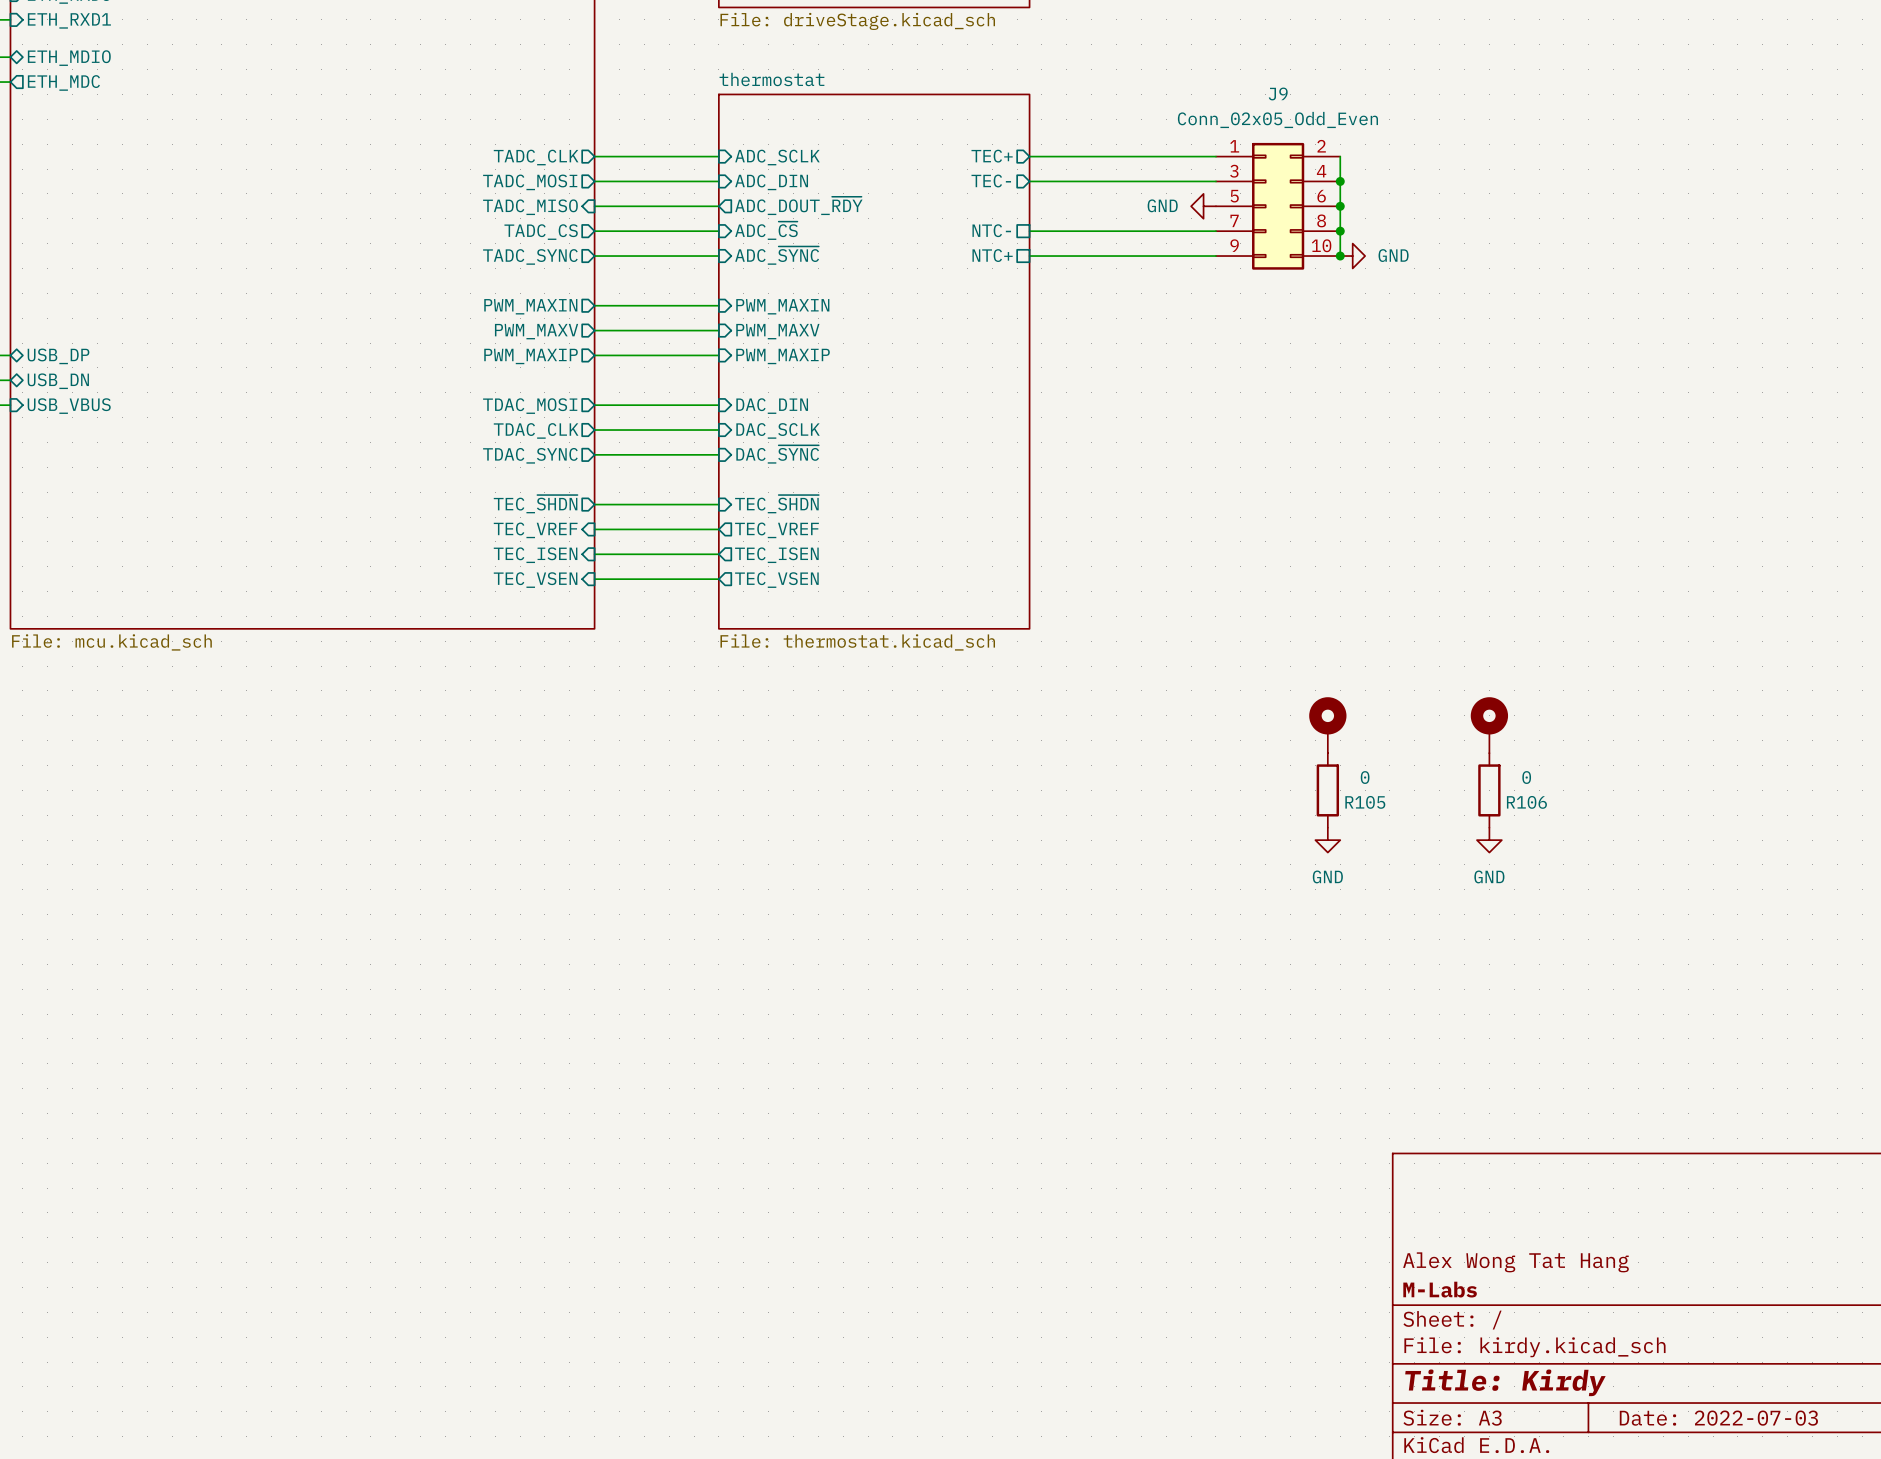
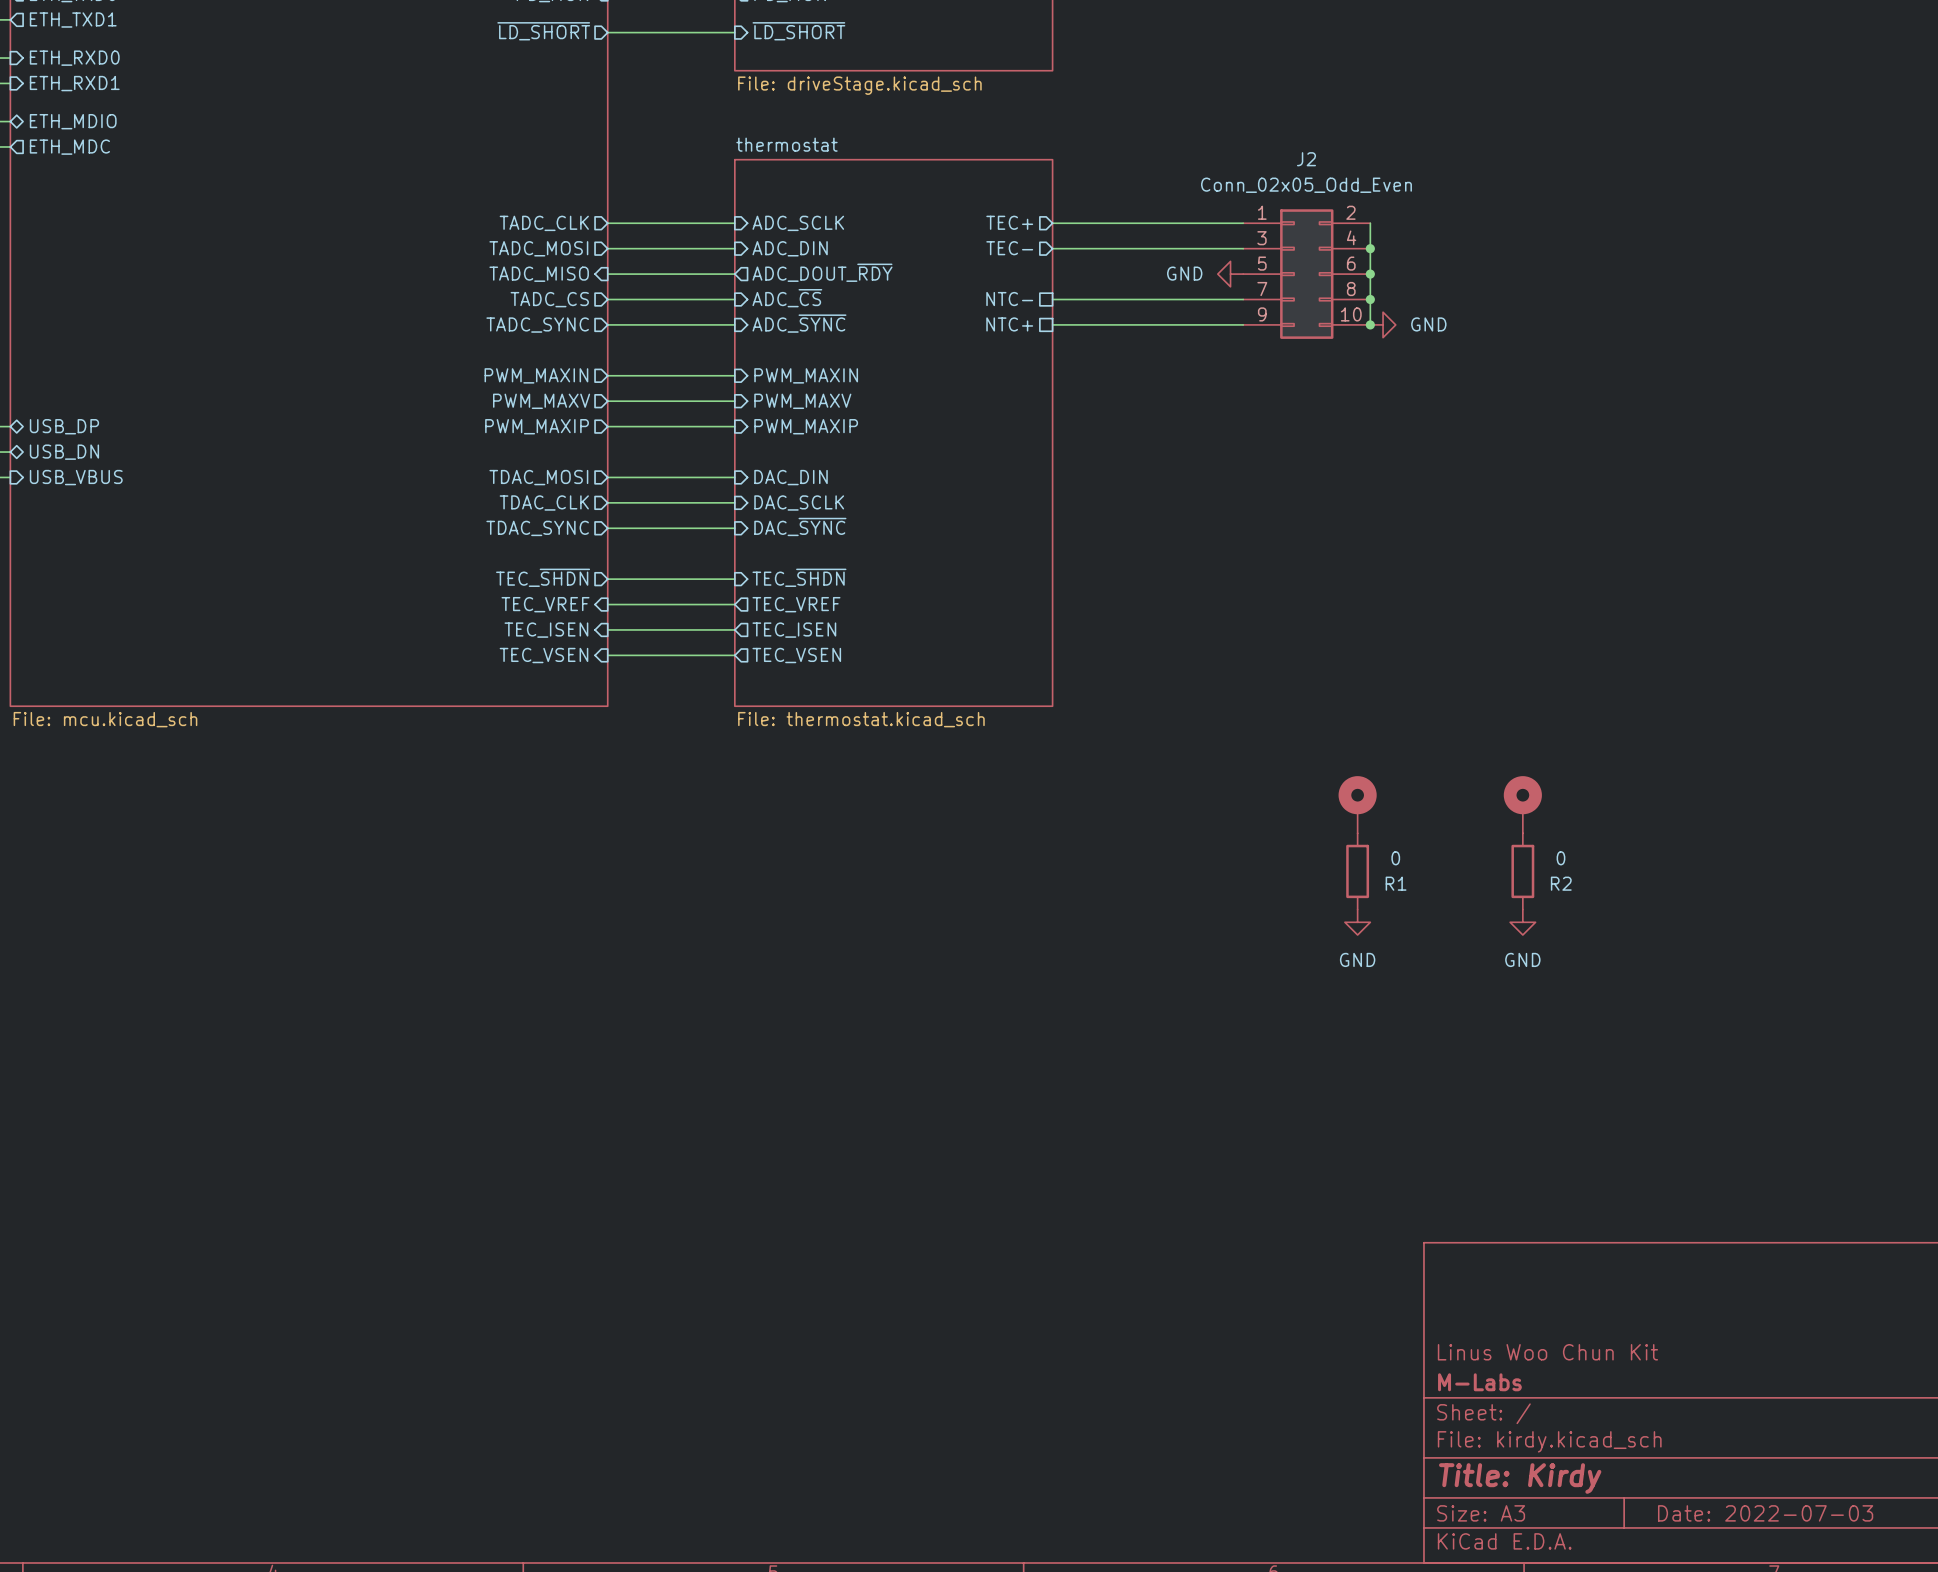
J9 name: J9 (1278, 93) -> J2 (1306, 159)
R105 name: R105 (1365, 802) -> R1 (1396, 883)
R106 name: R106 (1526, 802) -> R2 (1561, 883)
title block: Alex Wong Tat Hang (1515, 1262) -> Linus Woo Chun Kit (1547, 1352)

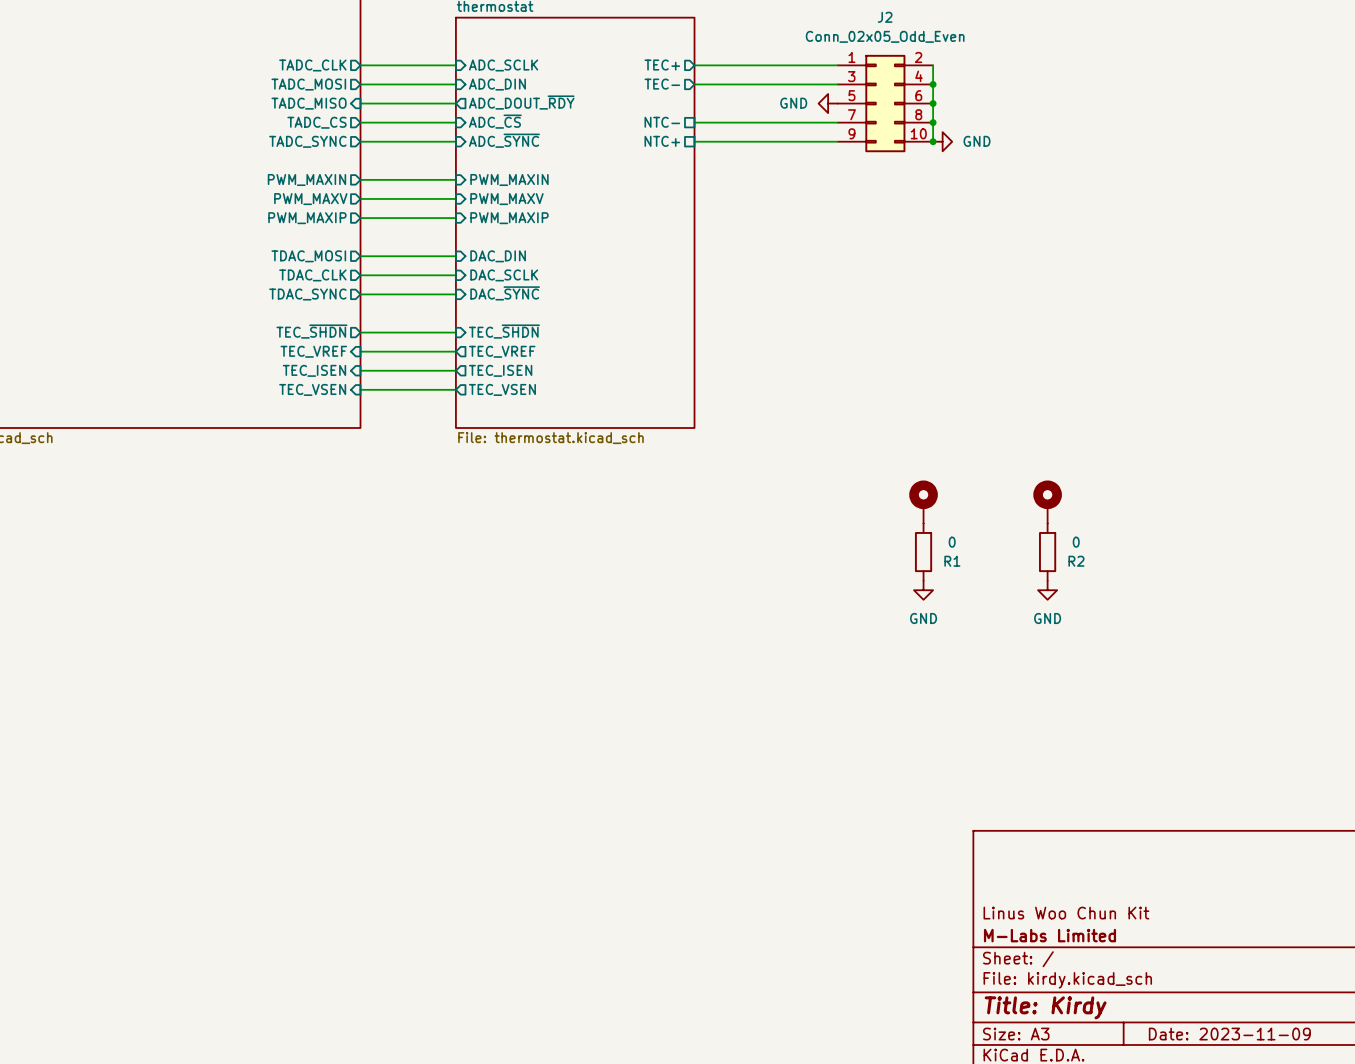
title block: M-Labs (1479, 1382) -> M-Labs Limited (1049, 935)
title block: Date: 2022-07-03 (1765, 1513) -> Date: 2023-11-09 (1229, 1034)

